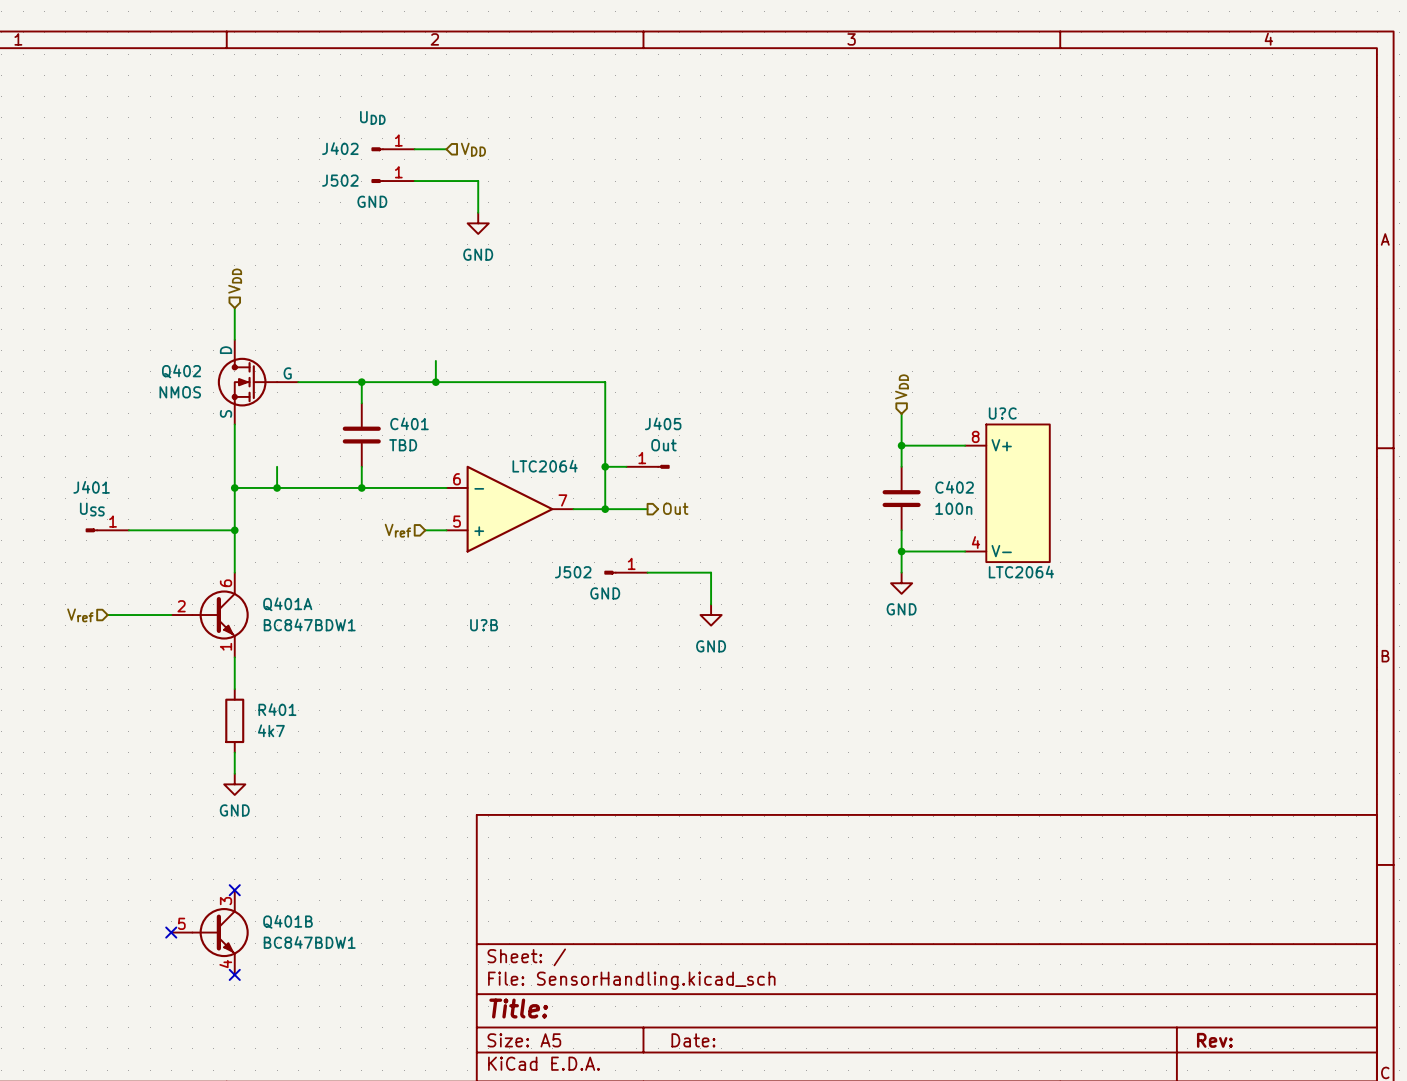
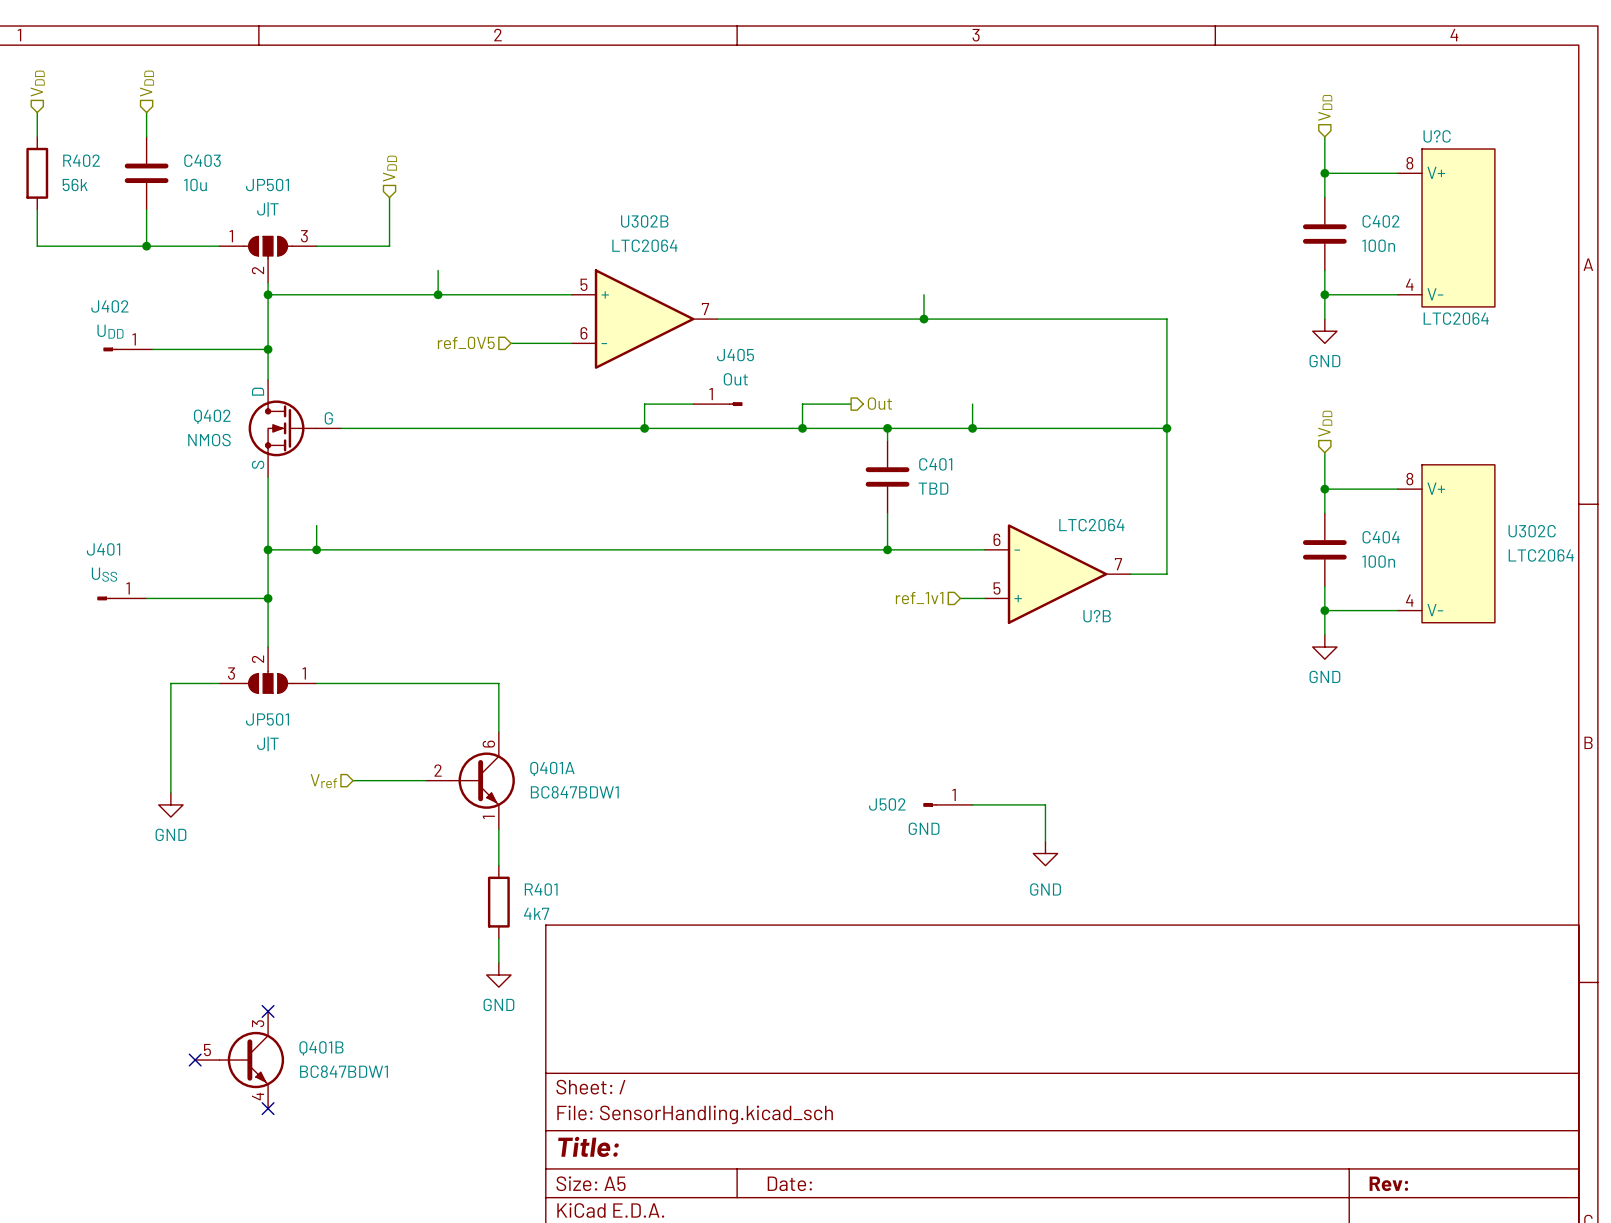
hierarchical label: none -> VDD (37, 83)
hierarchical label: none -> VDD (147, 83)
hierarchical label: none -> VDD (1325, 107)
wire: none -> (37, 112) (37, 136)
wire: none -> (146, 112) (146, 136)
J402 value position: UDD (372, 117) -> UDD (110, 331)
wire: none -> (1324, 136) (1324, 197)
J402 name position: J402 (340, 148) -> J402 (109, 306)
J402 position: (393, 149) -> (128, 349)
wire: (414, 149) (446, 149) -> none
hierarchical label: VDD (473, 149) -> none
hierarchical label: none -> VDD (389, 168)
R402: none -> 56k (37, 173)
C403: none -> 10u (146, 173)
wire: none -> (1324, 173) (1397, 173)
junction: none -> (1324, 173)
wire: none -> (389, 197) (389, 246) (316, 246)
J502: GND (393, 181) -> none
wire: (414, 181) (478, 181) (478, 212) -> none
wire: none -> (37, 209) (37, 246) (219, 246)
wire: none -> (146, 209) (146, 246)
U?C: none -> LTC2064 (1446, 227)
junction: none -> (146, 246)
power symbol: GND (478, 223) -> none
JP501: none -> J|T (268, 259)
wire: none -> (1324, 270) (1324, 319)
wire: none -> (268, 282) (268, 343)
wire: none -> (268, 294) (571, 294)
junction: none -> (268, 294)
junction: none -> (438, 294)
wire: none -> (923, 294) (923, 319)
wire: none -> (1324, 294) (1397, 294)
junction: none -> (1324, 294)
hierarchical label: VDD (235, 281) -> none
U302B: none -> LTC2064 (644, 319)
wire: none -> (717, 319) (1166, 319) (1166, 574) (1130, 574)
junction: none -> (923, 319)
power symbol: none -> GND (1324, 331)
hierarchical label: none -> ref_0V5 (466, 342)
wire: none -> (511, 343) (571, 343)
wire: none -> (152, 349) (268, 349)
junction: none -> (268, 349)
wire: (435, 360) (435, 382) -> (438, 270) (438, 294)
wire: none -> (693, 404) (644, 404) (644, 428)
wire: none -> (851, 404) (802, 404) (802, 428)
wire: none -> (972, 404) (972, 428)
hierarchical label: none -> VDD (1325, 423)
wire: (361, 382) (361, 403) -> none
junction: (361, 382) -> none
junction: (435, 382) -> none
junction: none -> (644, 428)
wire: (605, 382) (605, 509) -> (693, 428) (1166, 428)
junction: none -> (802, 428)
wire: none -> (887, 428) (887, 440)
junction: none -> (887, 428)
junction: none -> (972, 428)
junction: none -> (1166, 428)
hierarchical label: VDD (902, 386) -> none
wire: none -> (1324, 452) (1324, 513)
wire: (901, 413) (901, 466) -> none
C401 position: (361, 435) -> (887, 476)
wire: none -> (1324, 489) (1397, 489)
junction: none -> (1324, 489)
wire: (901, 445) (965, 445) -> none
junction: (901, 445) -> none
wire: none -> (887, 513) (887, 549)
wire: (361, 466) (361, 487) -> none
wire: (605, 466) (626, 466) -> none
junction: (605, 466) -> none
J405 position: (647, 466) -> (717, 404)
U302C: none -> LTC2064 (1446, 543)
junction: (361, 487) -> none
wire: none -> (511, 549) (984, 549)
junction: none -> (887, 549)
C404: none -> 100n (1324, 549)
U?C: LTC2064 (1007, 493) -> none
C402 position: (901, 498) -> (1324, 234)
hierarchical label position: Out (675, 508) -> Out (879, 403)
U?B: LTC2064 (509, 509) -> none
wire: (573, 509) (647, 509) -> none
junction: (605, 509) -> none
U?B: none -> LTC2064 (1057, 574)
wire: none -> (1324, 586) (1324, 634)
hierarchical label: Vref (397, 530) -> none
wire: (425, 530) (446, 530) -> none
hierarchical label: none -> ref_1v1 (919, 598)
wire: none -> (960, 598) (984, 598)
wire: (901, 530) (901, 572) -> none
wire: none -> (1324, 610) (1397, 610)
junction: none -> (1324, 610)
wire: (901, 551) (965, 551) -> none
junction: (901, 551) -> none
J502: GND (626, 572) -> none
wire: (647, 572) (711, 572) (711, 604) -> none
power symbol: none -> GND (1324, 647)
power symbol: GND (901, 583) -> none
JP501: none -> J|T (268, 670)
wire: none -> (219, 683) (170, 683) (170, 792)
wire: none -> (316, 683) (498, 683) (498, 732)
hierarchical label: Vref (80, 615) -> none
wire: (107, 615) (171, 615) -> none
Q401A position: (209, 615) -> (470, 780)
power symbol: GND (711, 615) -> none
wire: (234, 657) (234, 689) -> none
hierarchical label: none -> Vref (323, 781)
wire: none -> (353, 780) (425, 780)
power symbol: none -> GND (170, 804)
J502: none -> GND (947, 804)
wire: none -> (972, 804) (1045, 804) (1045, 841)
R401 position: (234, 720) -> (498, 902)
wire: none -> (498, 829) (498, 865)
wire: (234, 752) (234, 773) -> none
power symbol: none -> GND (1045, 853)
power symbol: GND (234, 784) -> none
wire: none -> (498, 938) (498, 962)
power symbol: none -> GND (498, 974)

